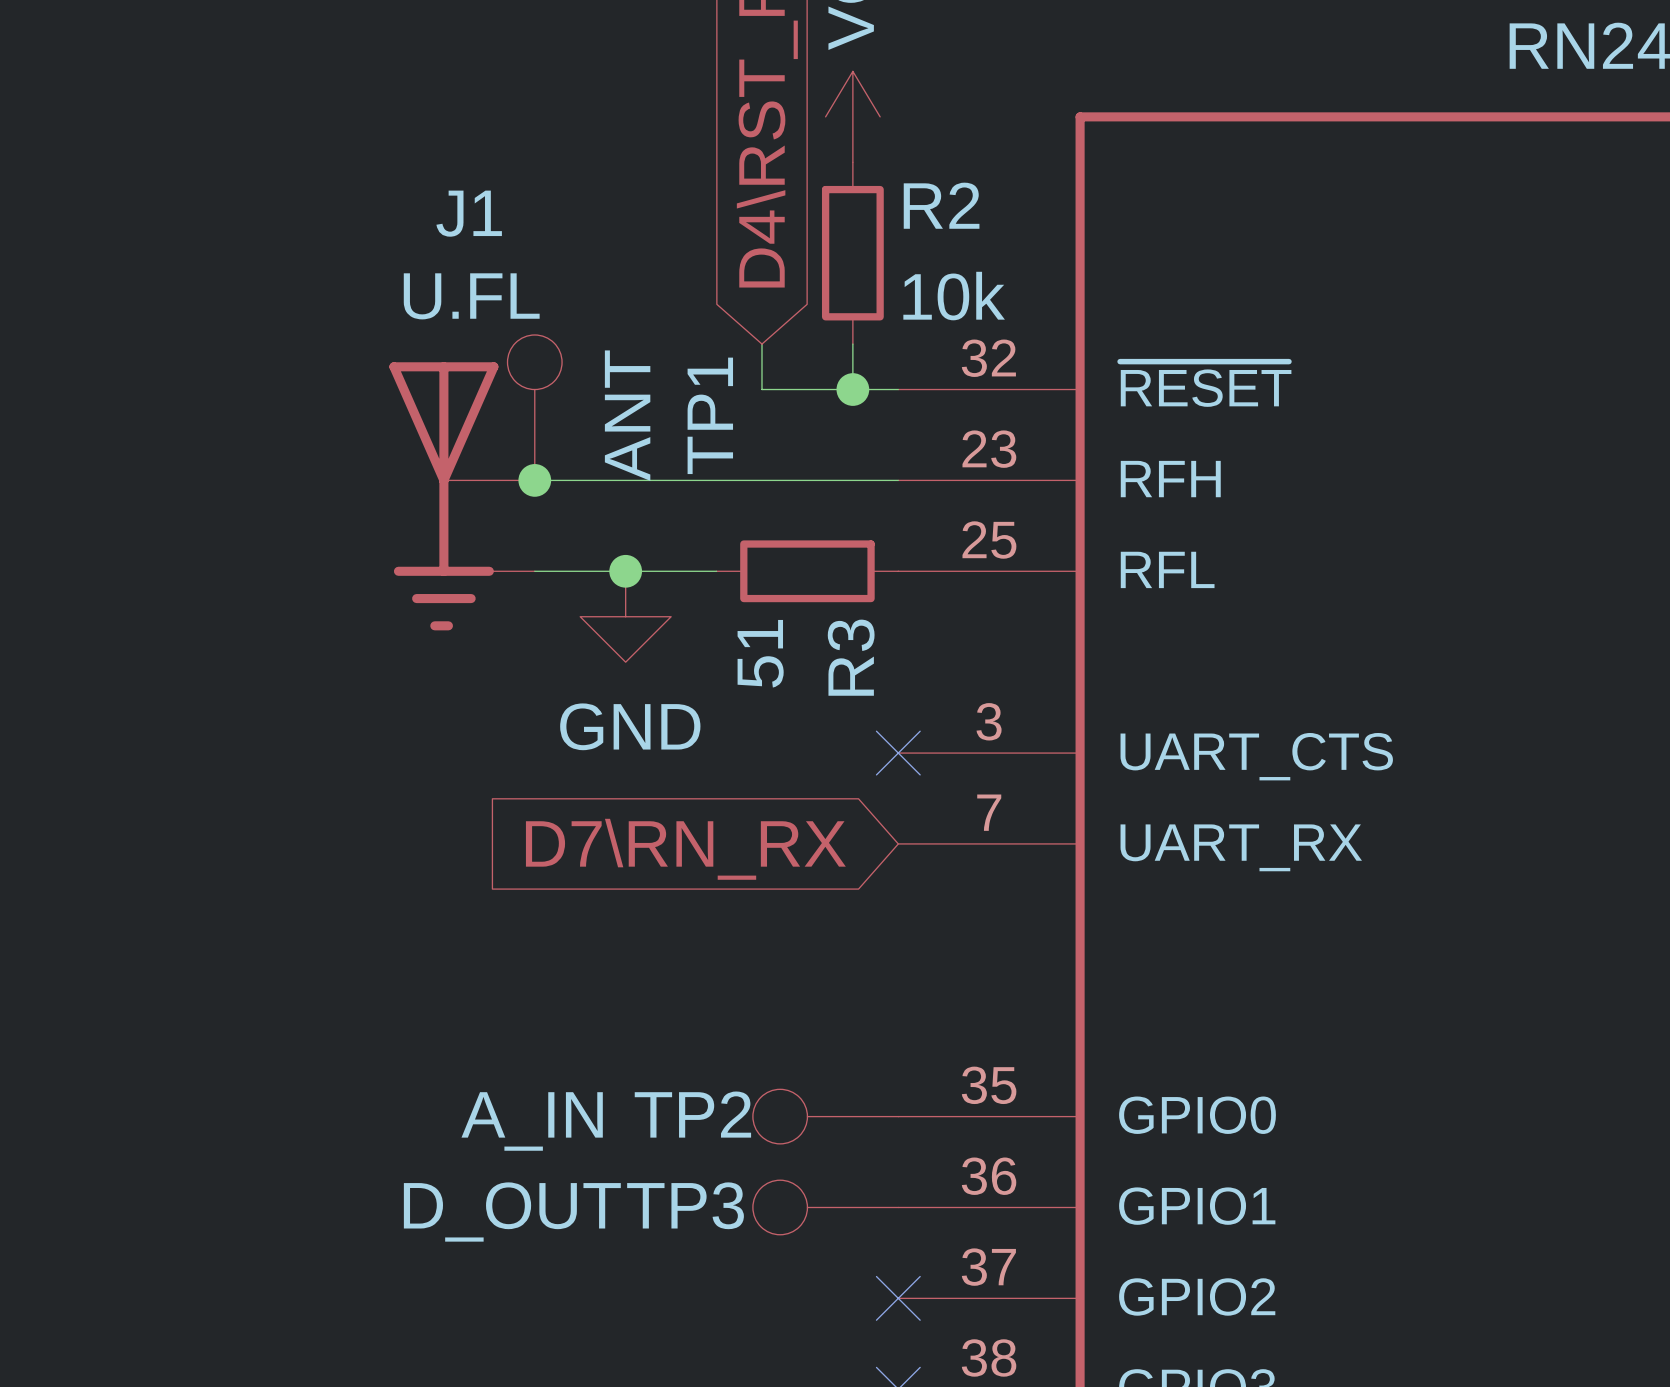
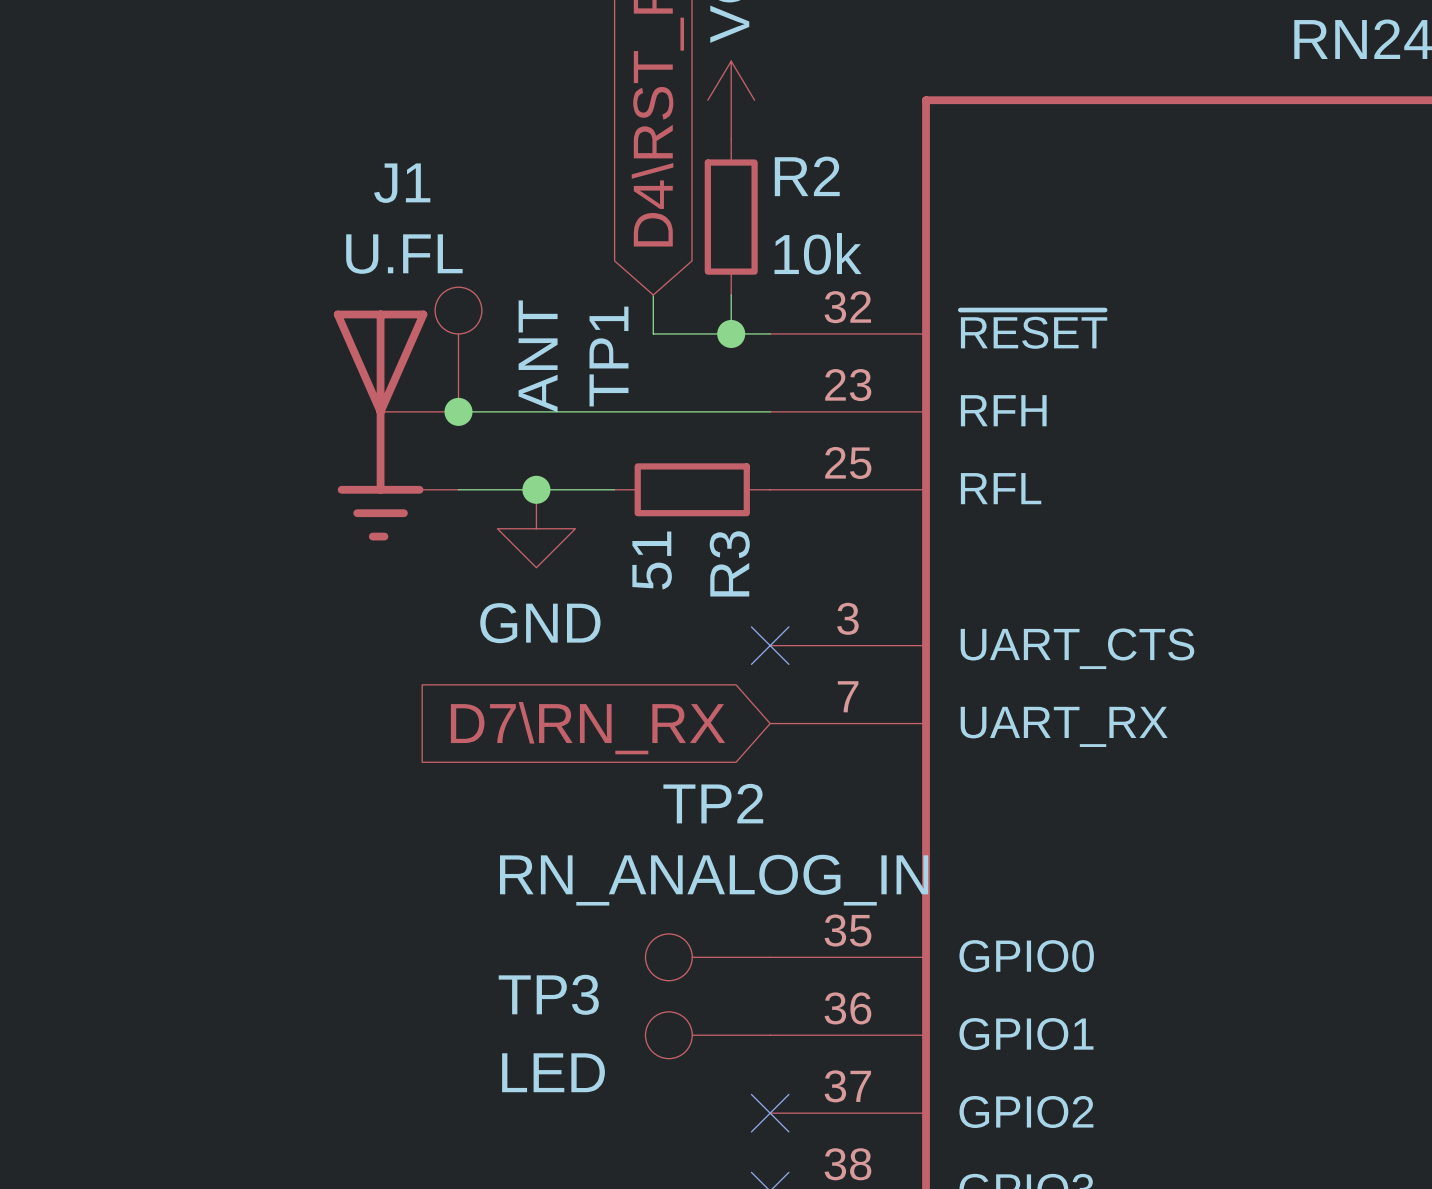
TP2 name position: TP2 (692, 1114) -> TP2 (713, 803)
TP2 value: A_IN (532, 1121) -> RN_ANALOG_IN (714, 880)
TP3 name position: TP3 (685, 1205) -> TP3 (548, 994)
TP3 value: D_OUT (512, 1212) -> LED (553, 1072)

